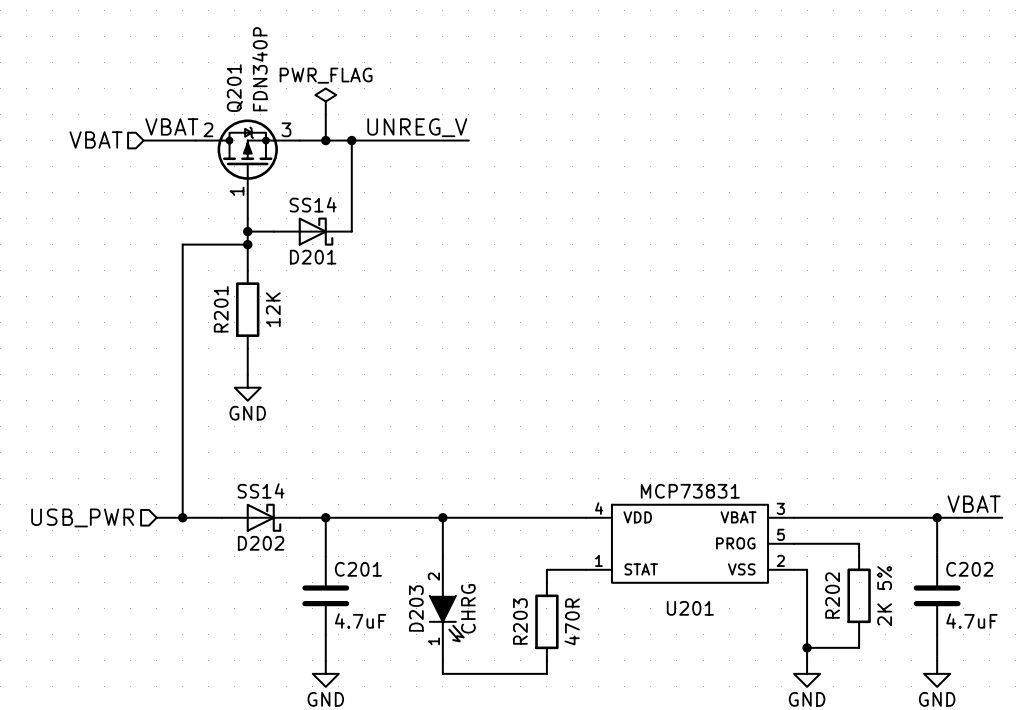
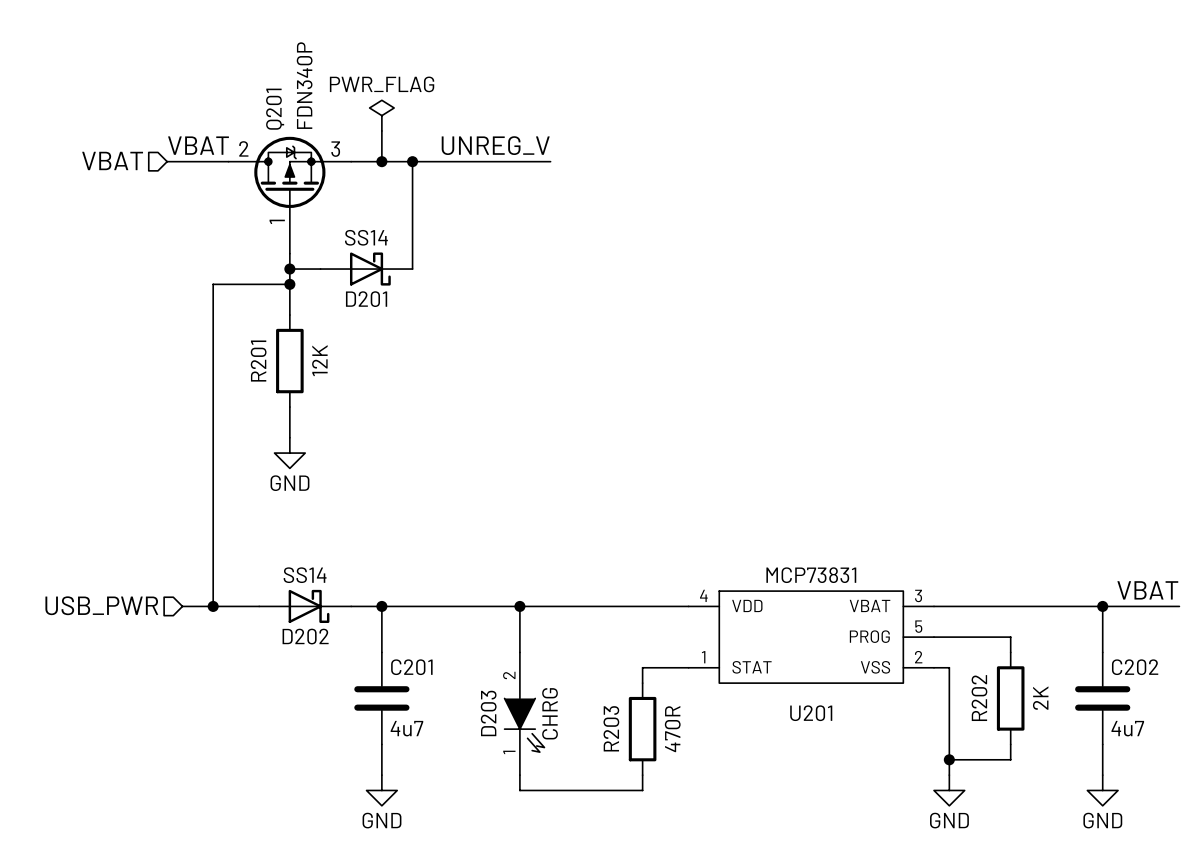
R202 value: 2K 5% (884, 596) -> 2K (1040, 698)
C201 value: 4.7uF (360, 621) -> 4u7 (406, 728)
C202 value: 4.7uF (971, 621) -> 4u7 (1127, 728)

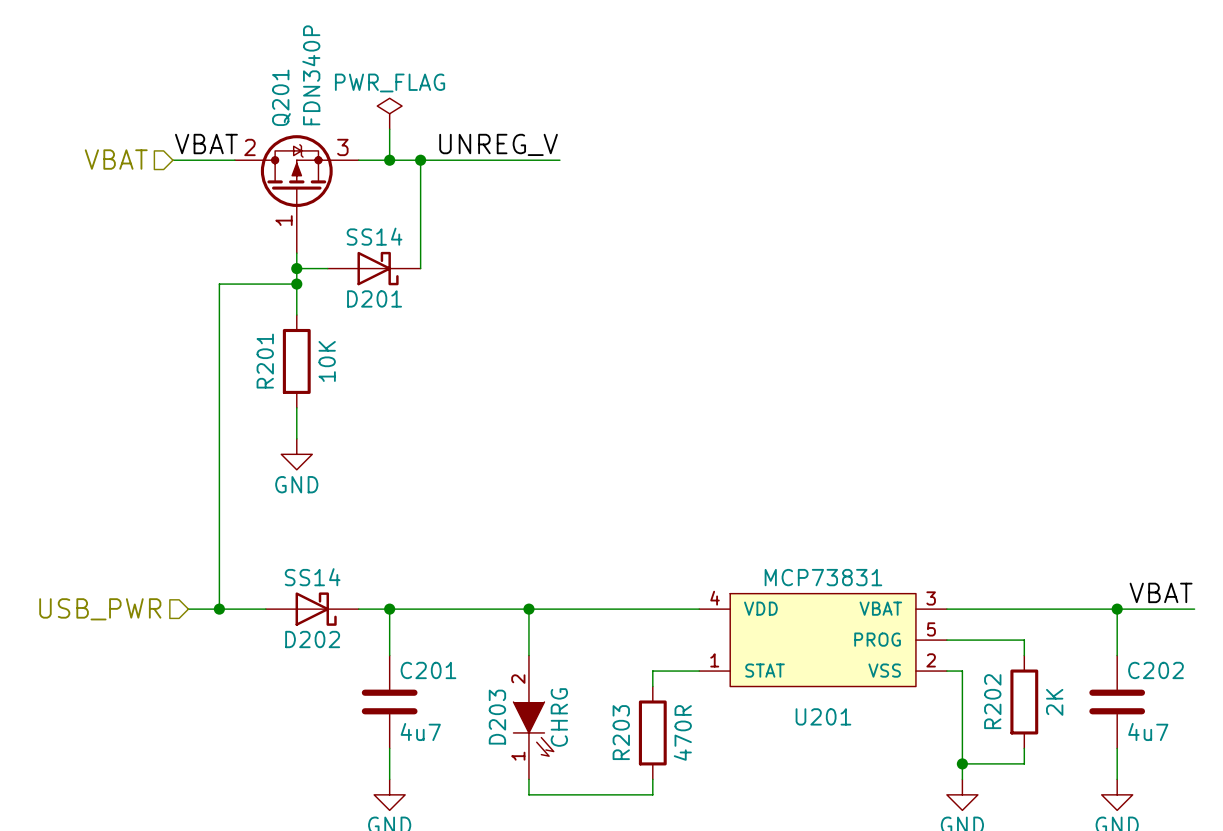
R201 value: 12K (319, 360) -> 10K (327, 361)

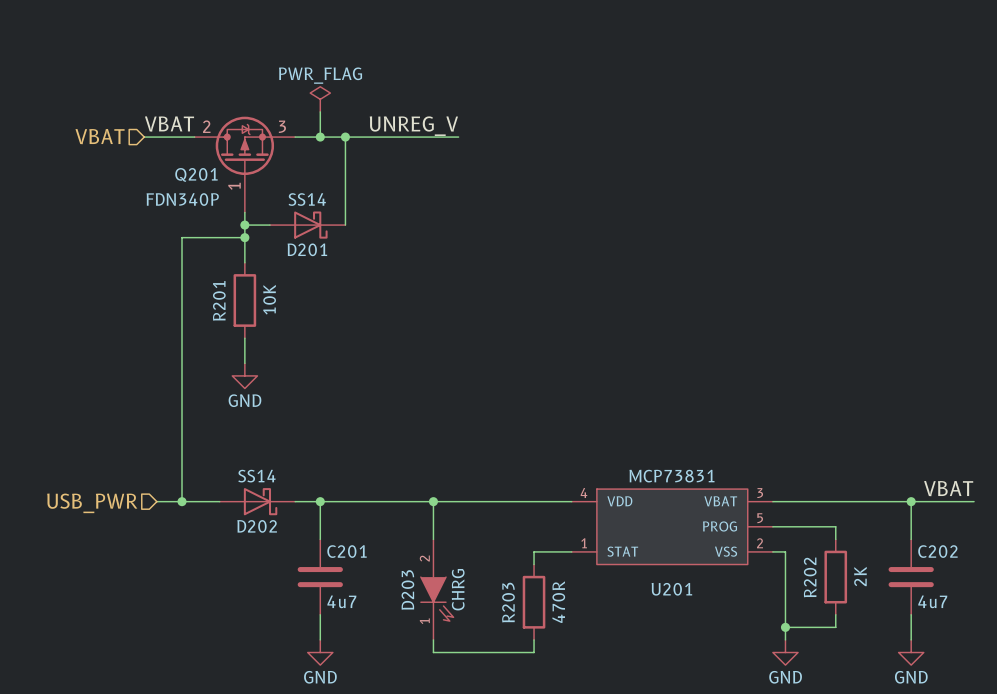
Q201 value rotation: 0° (311, 75) -> 90° clockwise (182, 199)
Q201 value position: FDN340P (311, 75) -> FDN340P (182, 199)
Q201 name rotation: 0° (281, 97) -> 90° clockwise (196, 174)
Q201 name position: Q201 (281, 97) -> Q201 (196, 174)

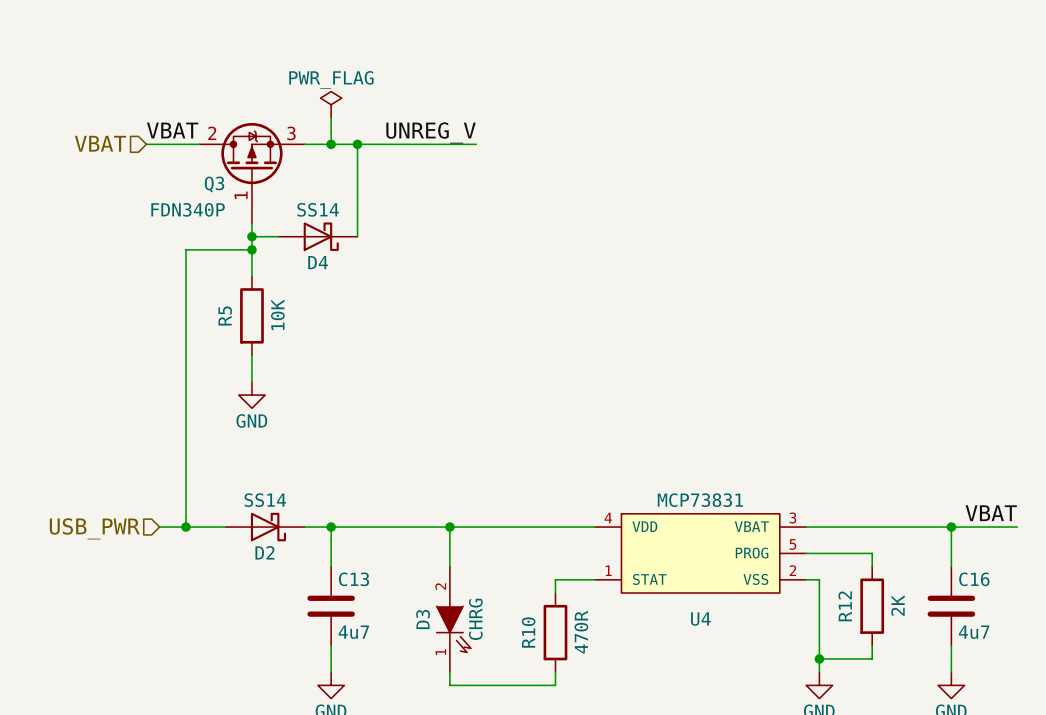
Q201 name: Q201 (196, 174) -> Q3 (214, 184)
D201 name: D201 (307, 249) -> D4 (318, 262)
R201 name: R201 (219, 300) -> R5 (225, 315)
D202 name: D202 (257, 526) -> D2 (264, 552)
C201 name: C201 (347, 551) -> C13 (354, 579)
C202 name: C202 (937, 551) -> C16 (974, 579)
R202 name: R202 (810, 577) -> R12 (845, 606)
D203 name: D203 (407, 589) -> D3 (423, 619)
U201 name: U201 (671, 589) -> U4 (700, 619)
R203 name: R203 (508, 602) -> R10 (528, 632)

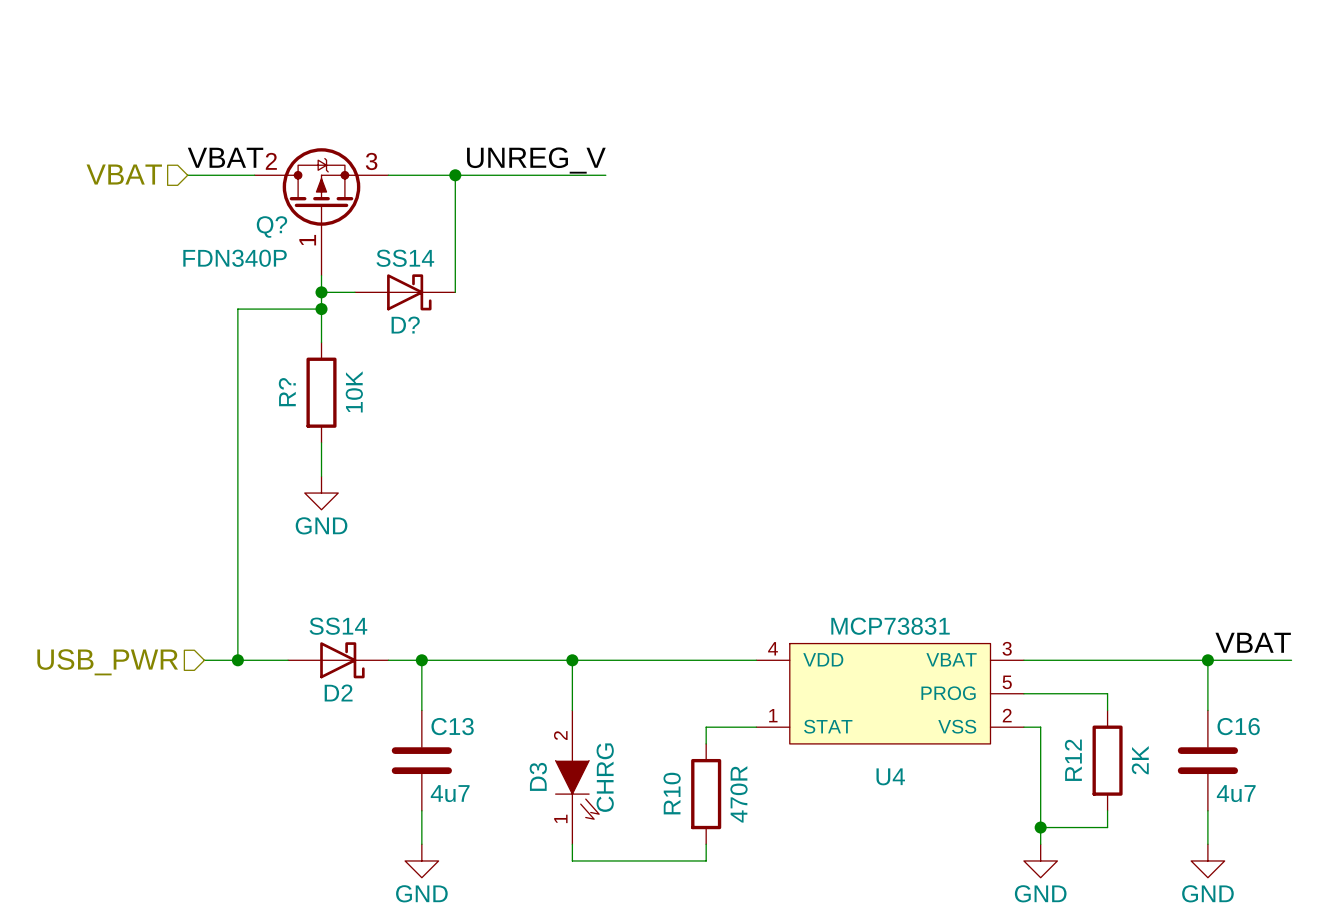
power symbol: PWR_FLAG (331, 104) -> none
wire: (331, 117) (331, 144) -> none
junction: (331, 144) -> none
Q3 name: Q3 (214, 184) -> Q? (271, 226)
D4 name: D4 (318, 262) -> D? (405, 325)
R5 name: R5 (225, 315) -> R? (287, 392)

